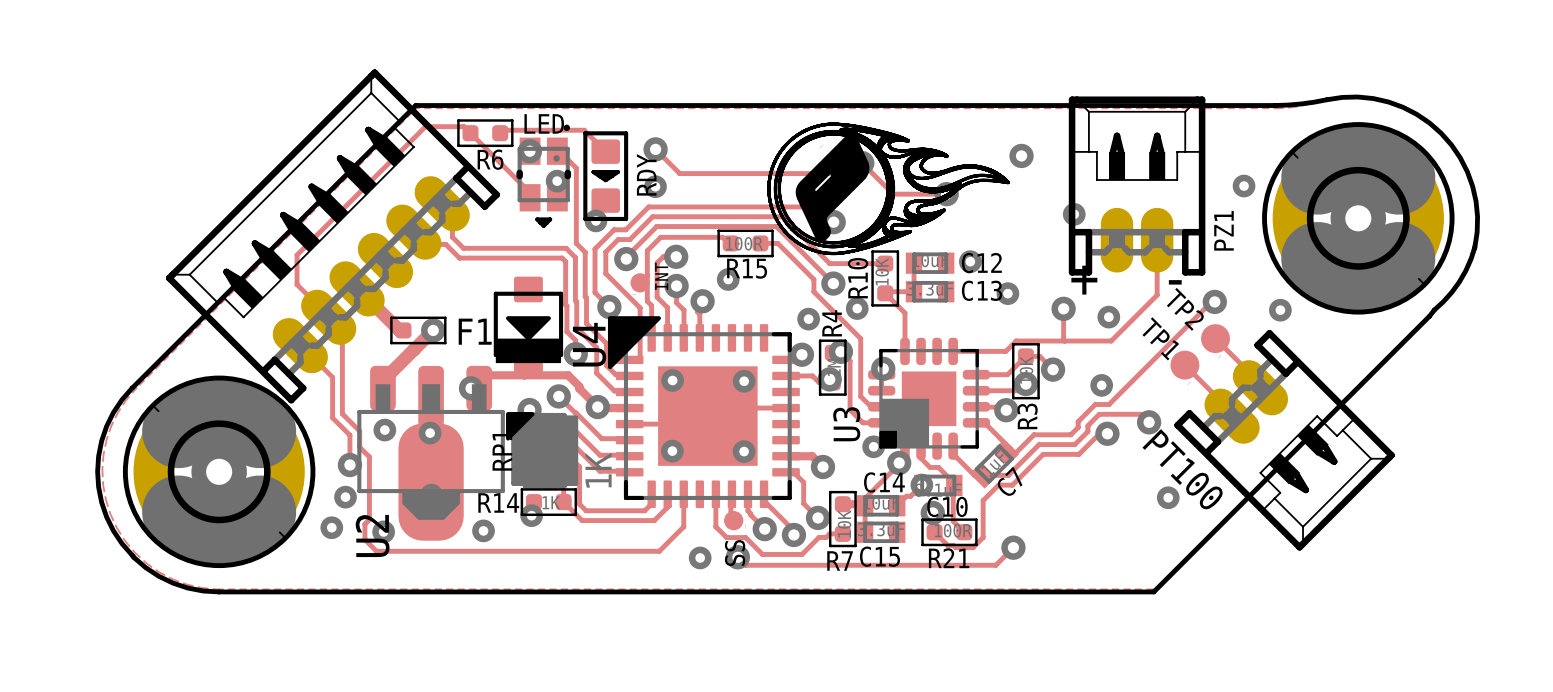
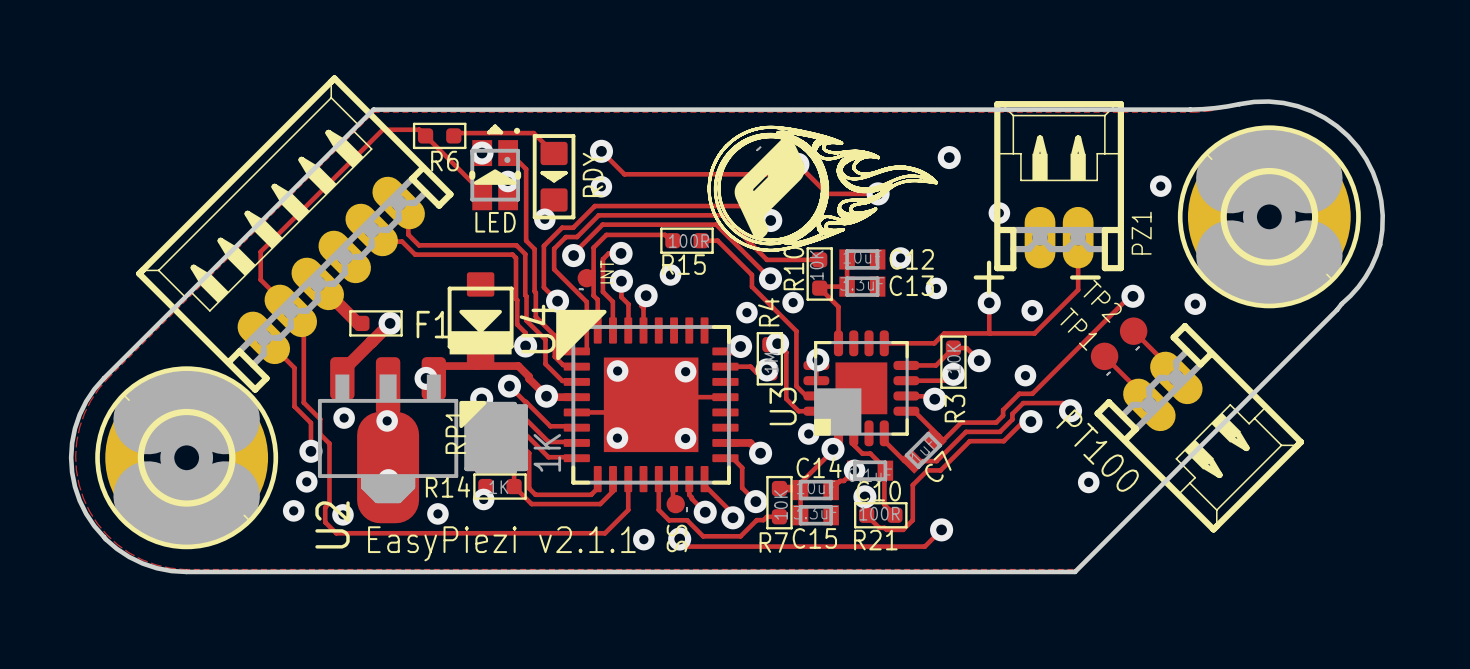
LED name position: LED (544, 123) -> LED (495, 222)
LED footprint: [516, 124, 572, 228] -> [469, 124, 522, 211]
text: none -> EasyPiezi v2.1.1 (501, 543)

